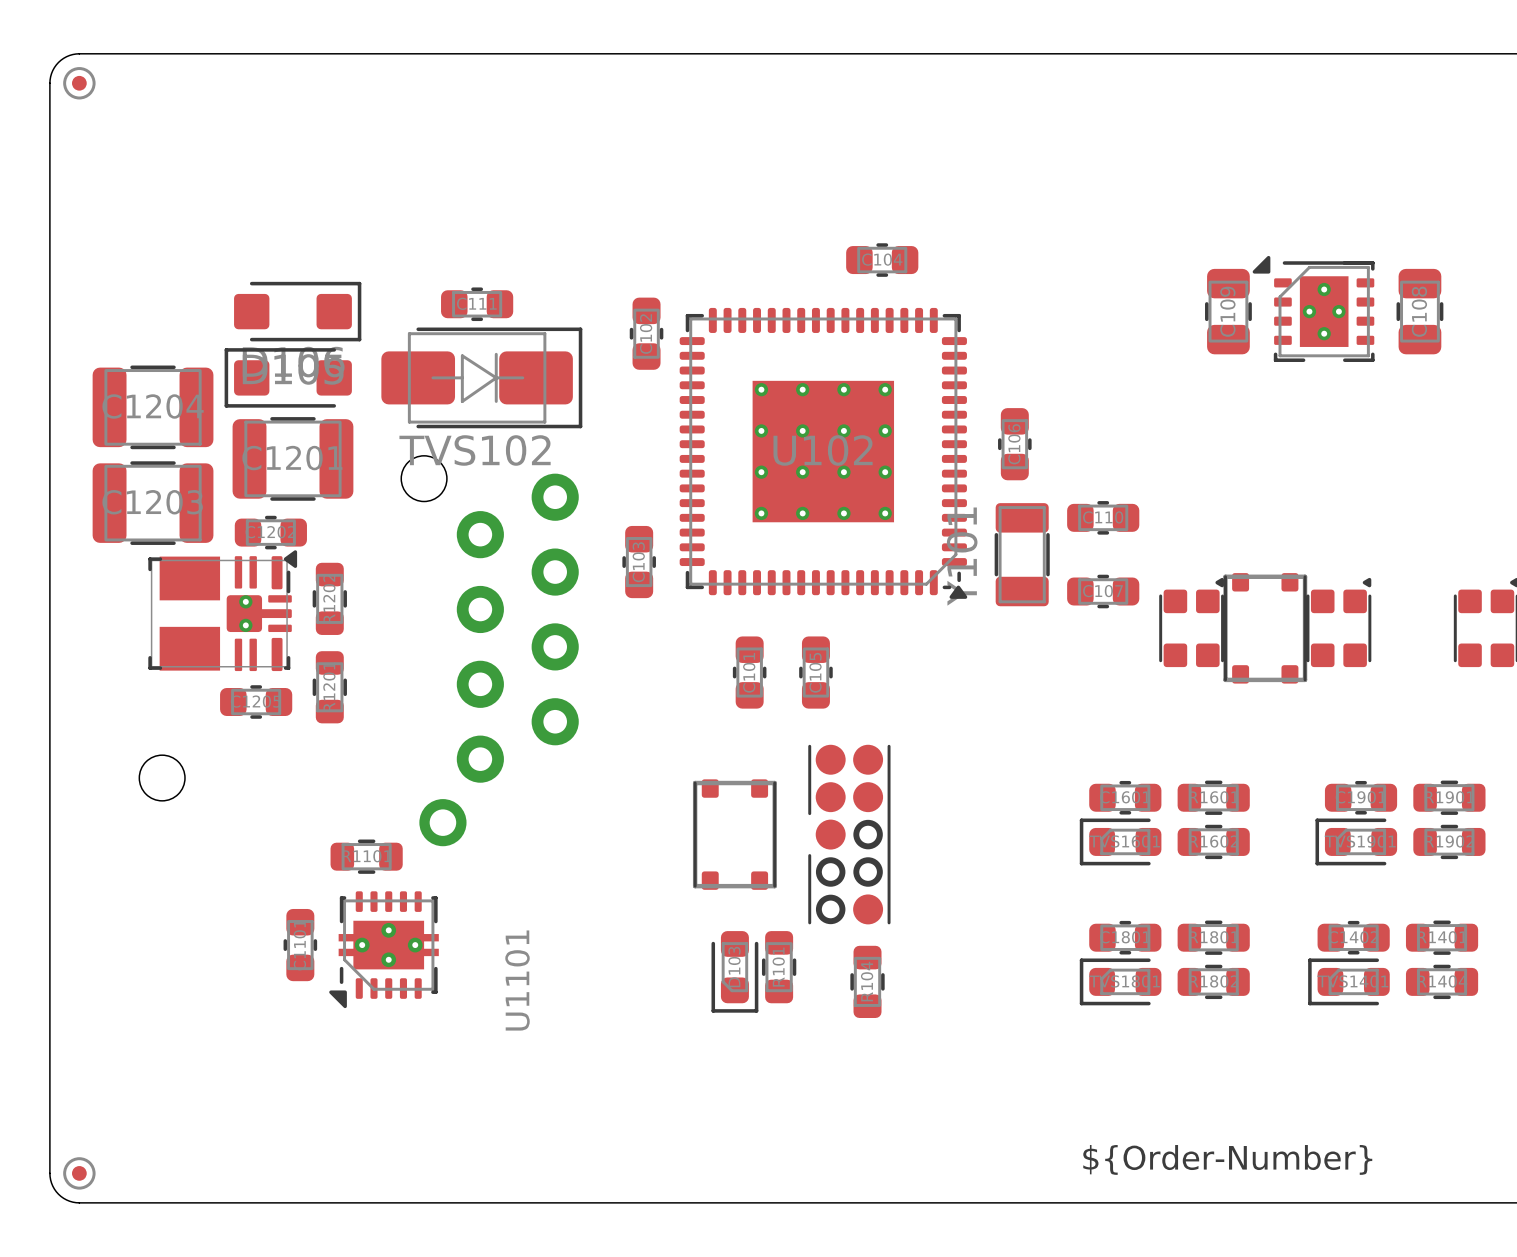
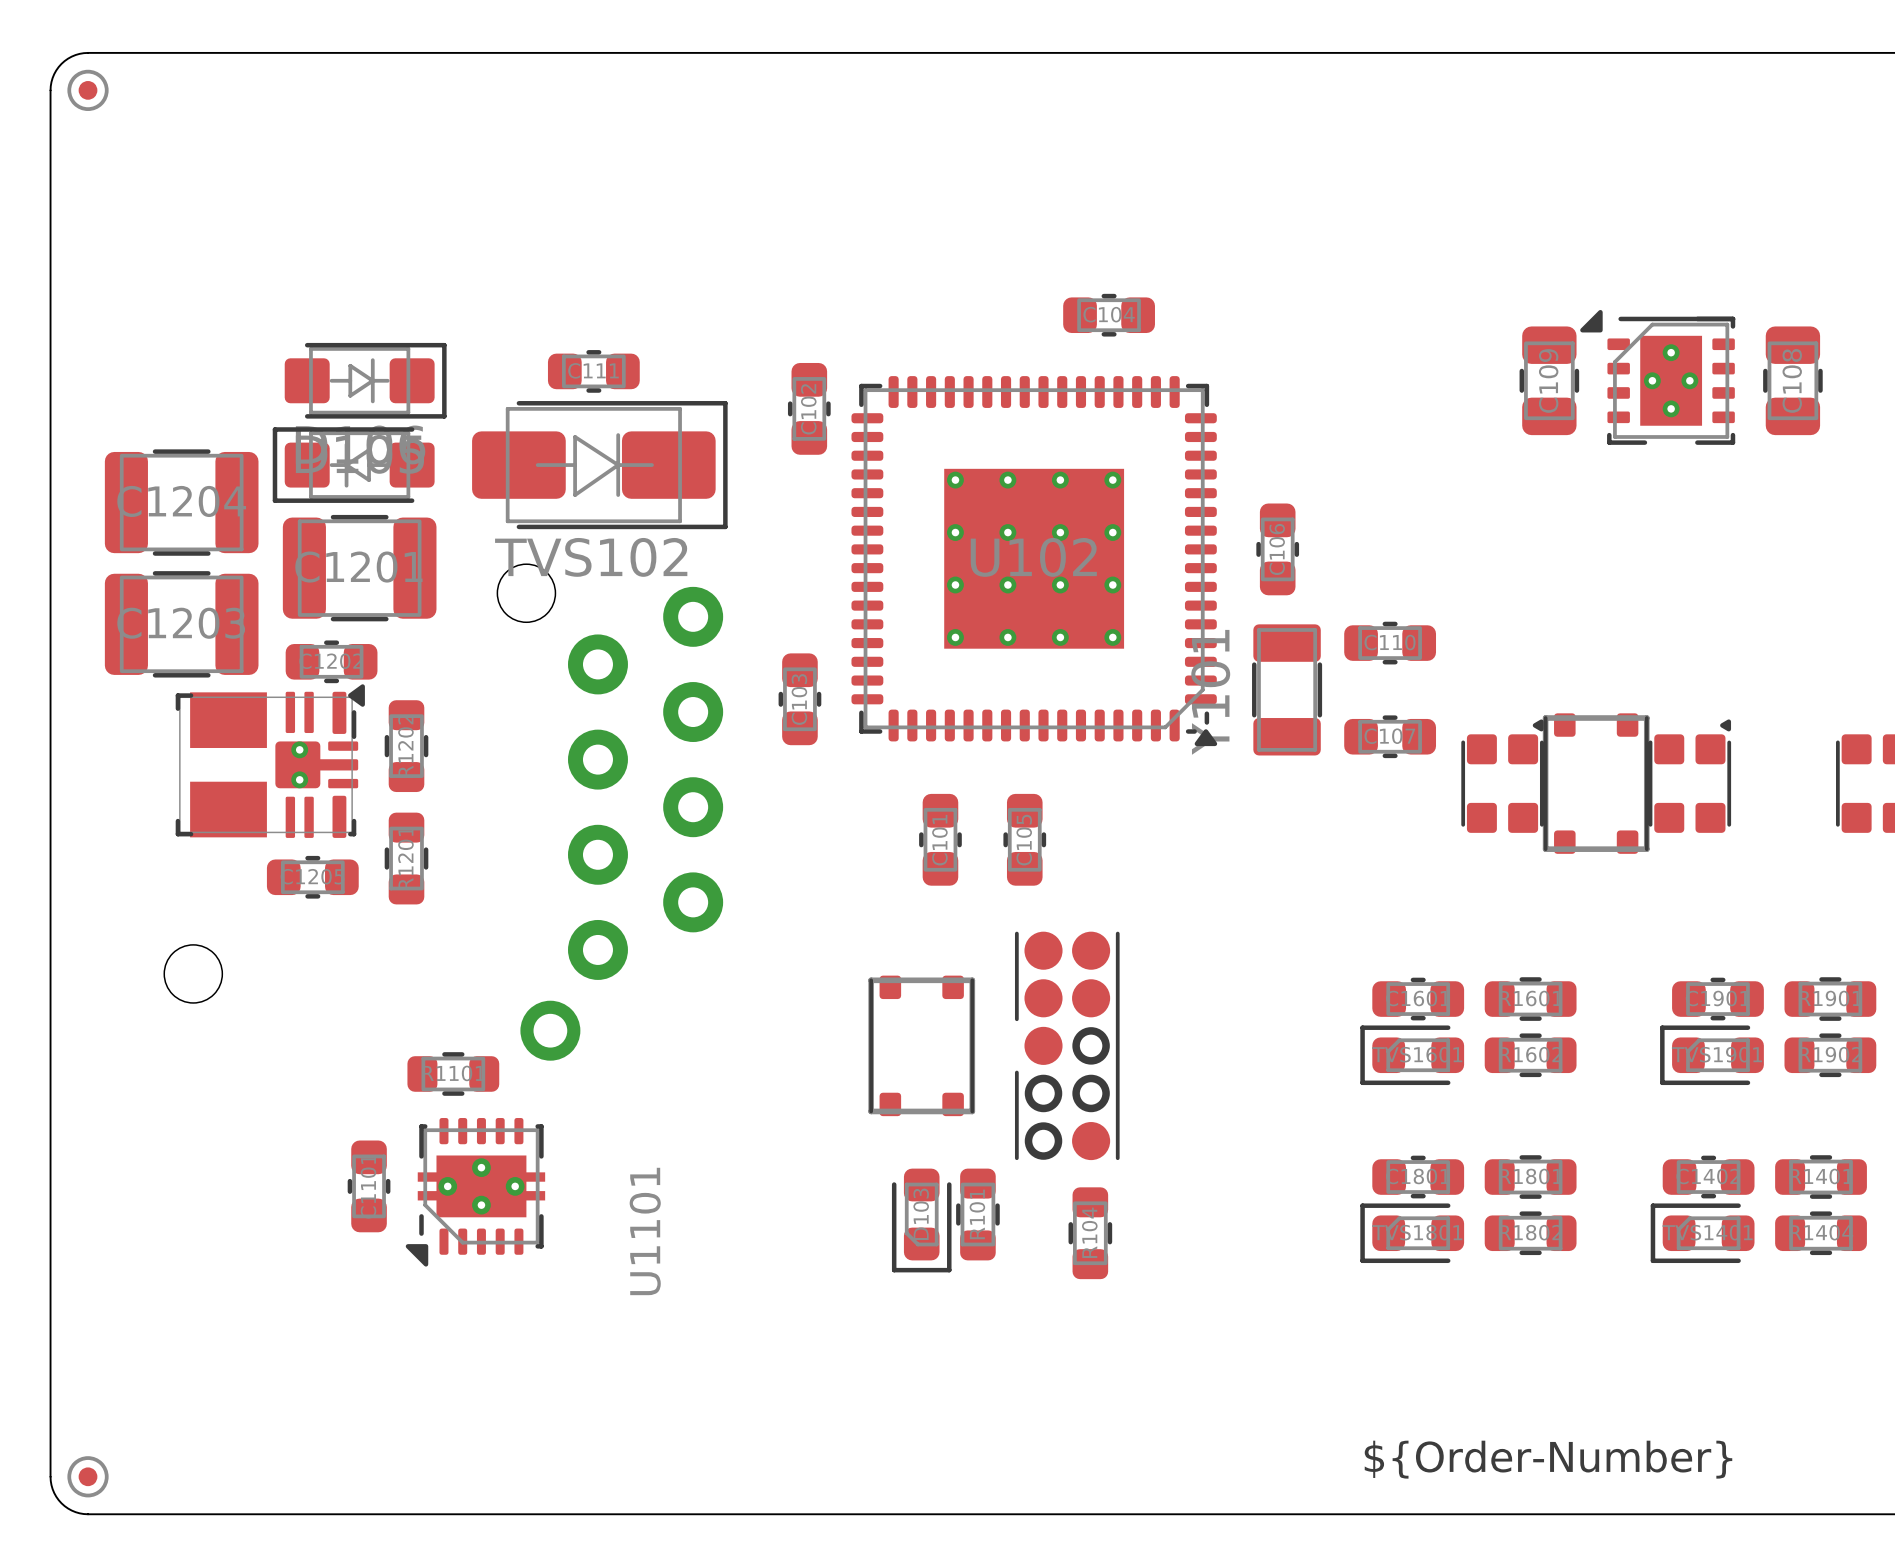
part footprint: [234, 281, 362, 342] -> [284, 342, 447, 419]
part footprint: [224, 348, 352, 408] -> [272, 427, 435, 503]

